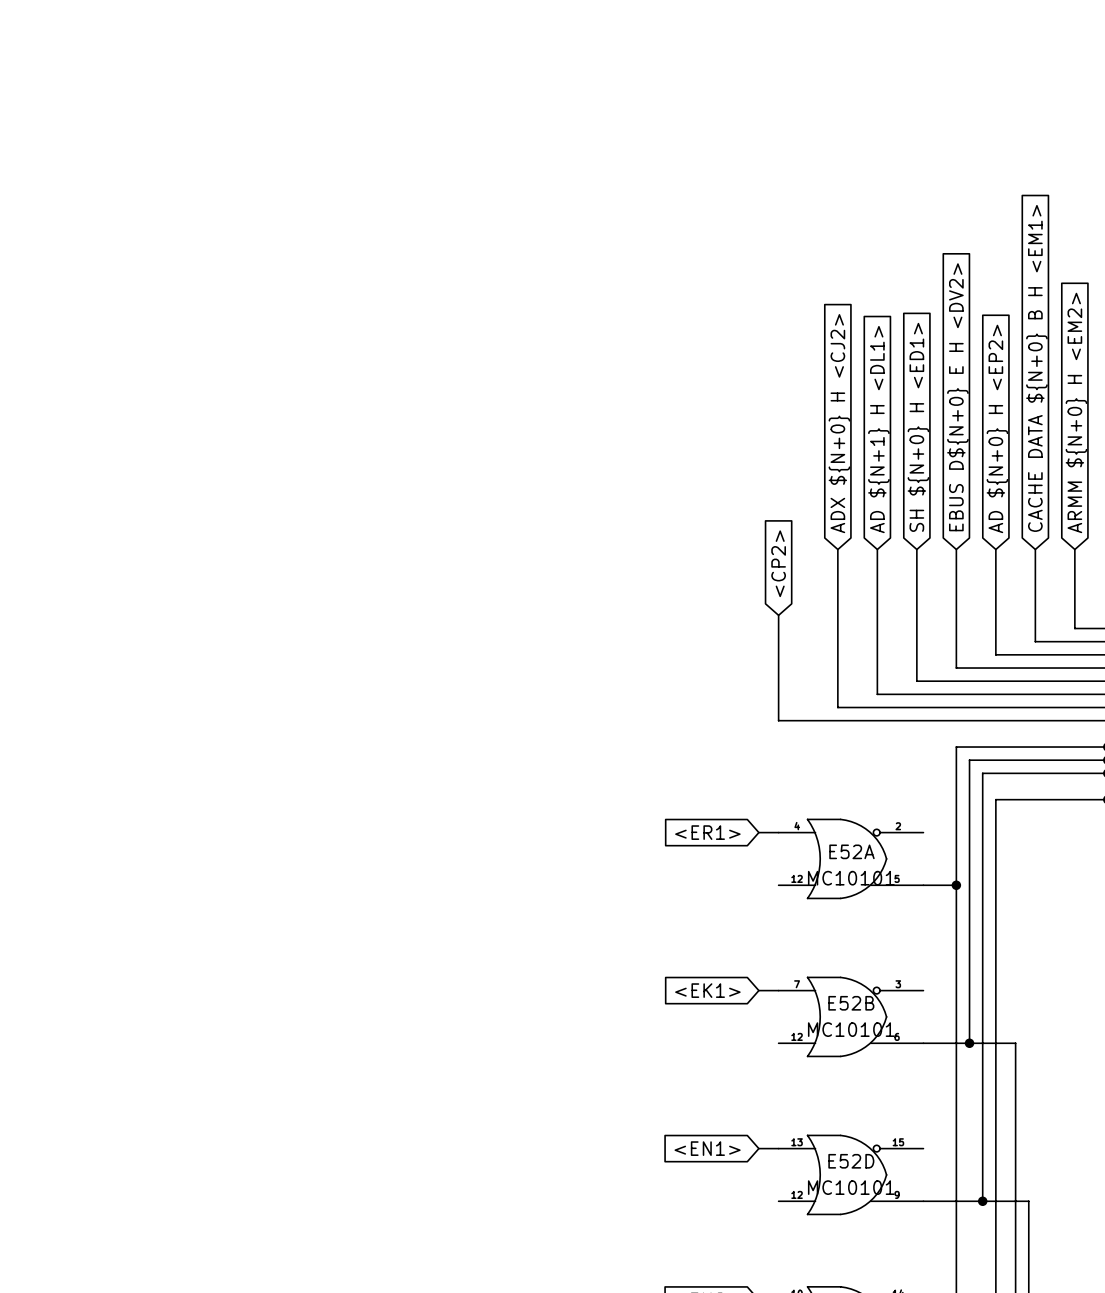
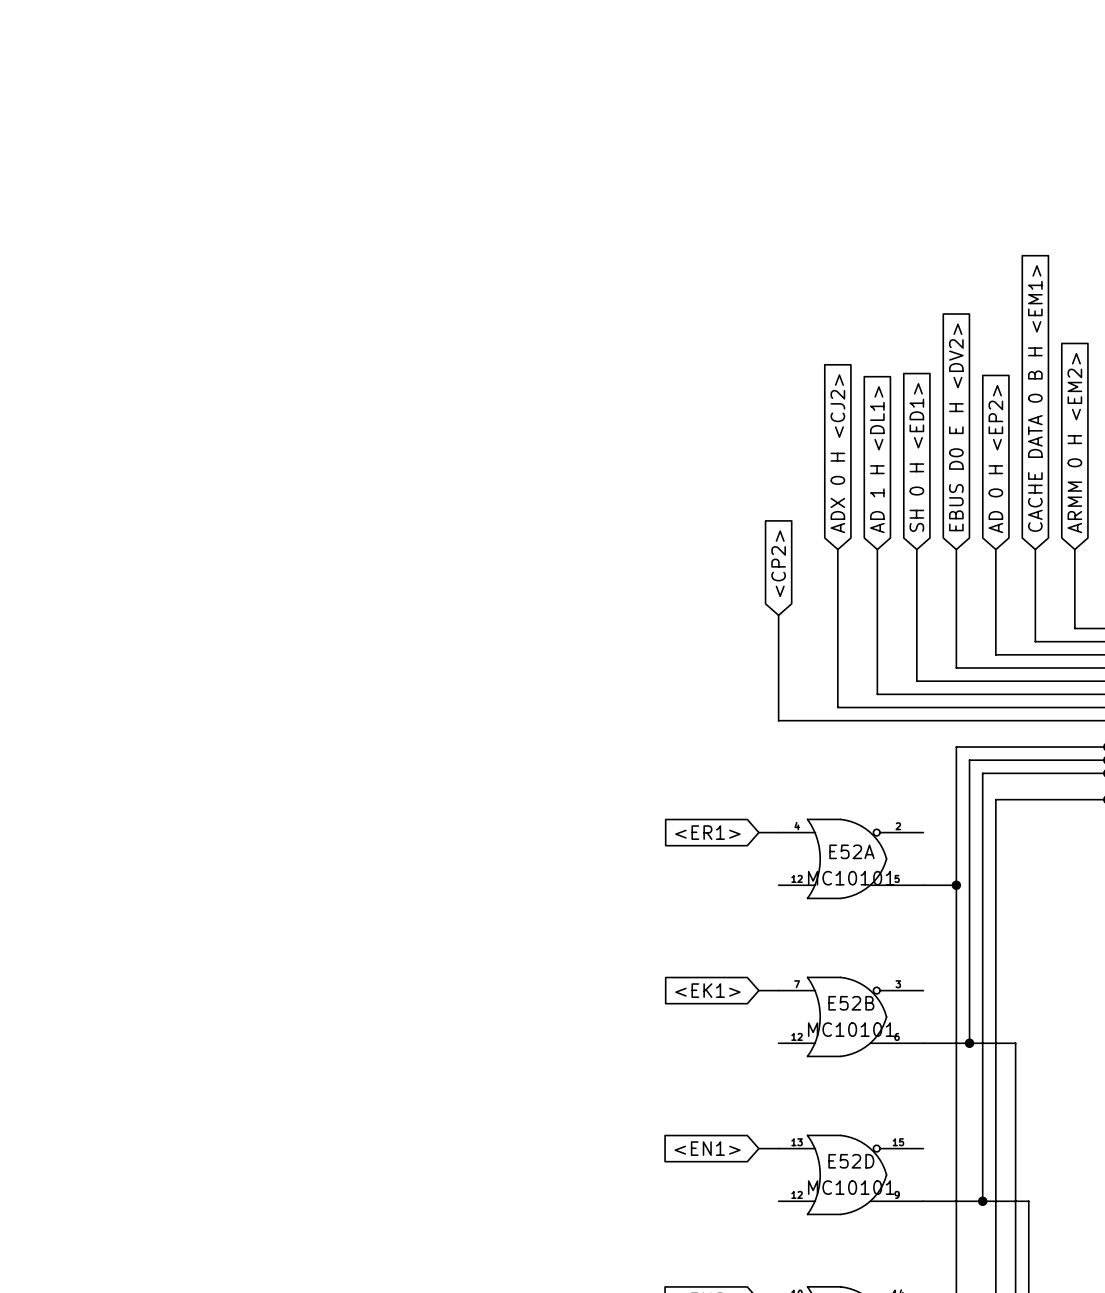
global label: CACHE DATA ${N+0} B H <EM1> (1036, 368) -> CACHE DATA 0 B H <EM1> (1035, 398)
global label: EBUS D${N+0} E H <DV2> (957, 397) -> EBUS D0 E H <DV2> (956, 427)
global label: ARMM ${N+0} H <EM2> (1076, 412) -> ARMM 0 H <EM2> (1074, 443)
global label: ADX ${N+0} H <CJ2> (839, 423) -> ADX 0 H <CJ2> (837, 453)
global label: SH ${N+0} H <ED1> (918, 427) -> SH 0 H <ED1> (916, 457)
global label: AD ${N+0} H <EP2> (997, 428) -> AD 0 H <EP2> (995, 459)
global label: AD ${N+1} H <DL1> (878, 429) -> AD 1 H <DL1> (877, 459)

